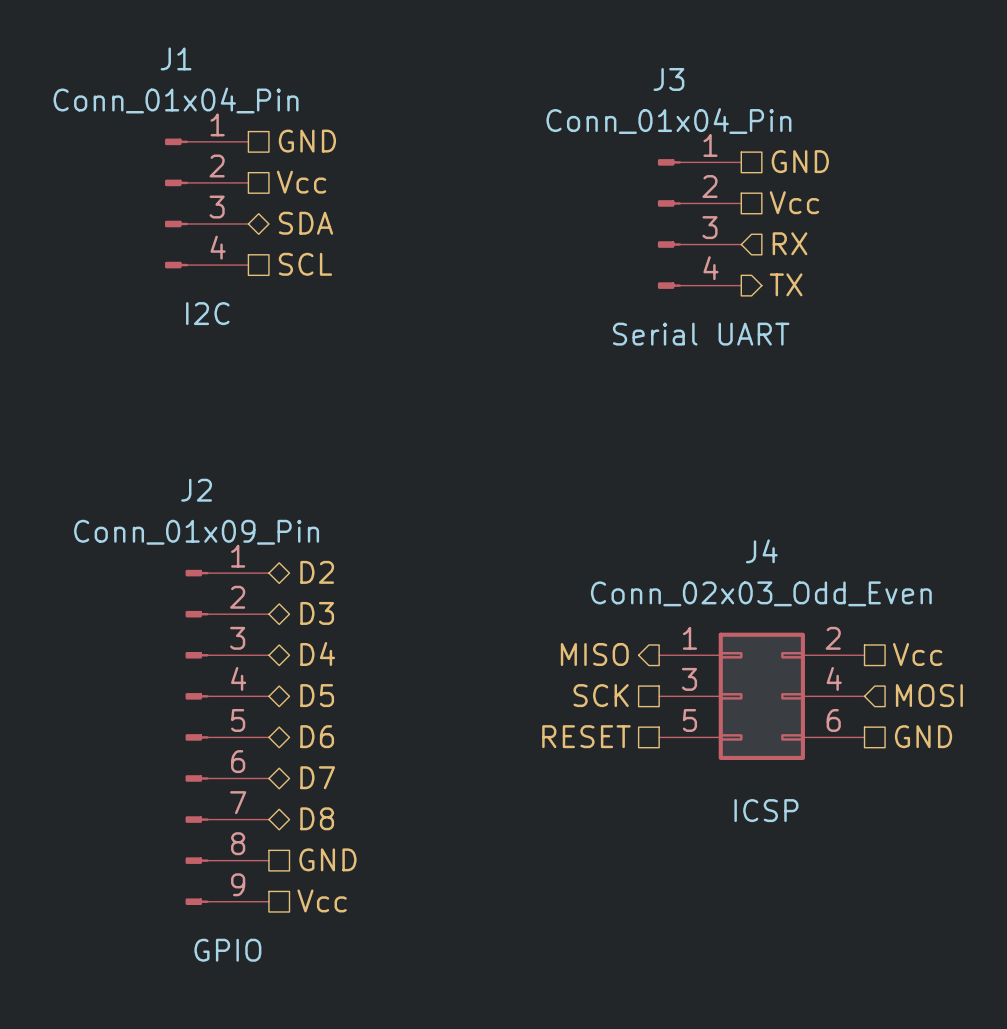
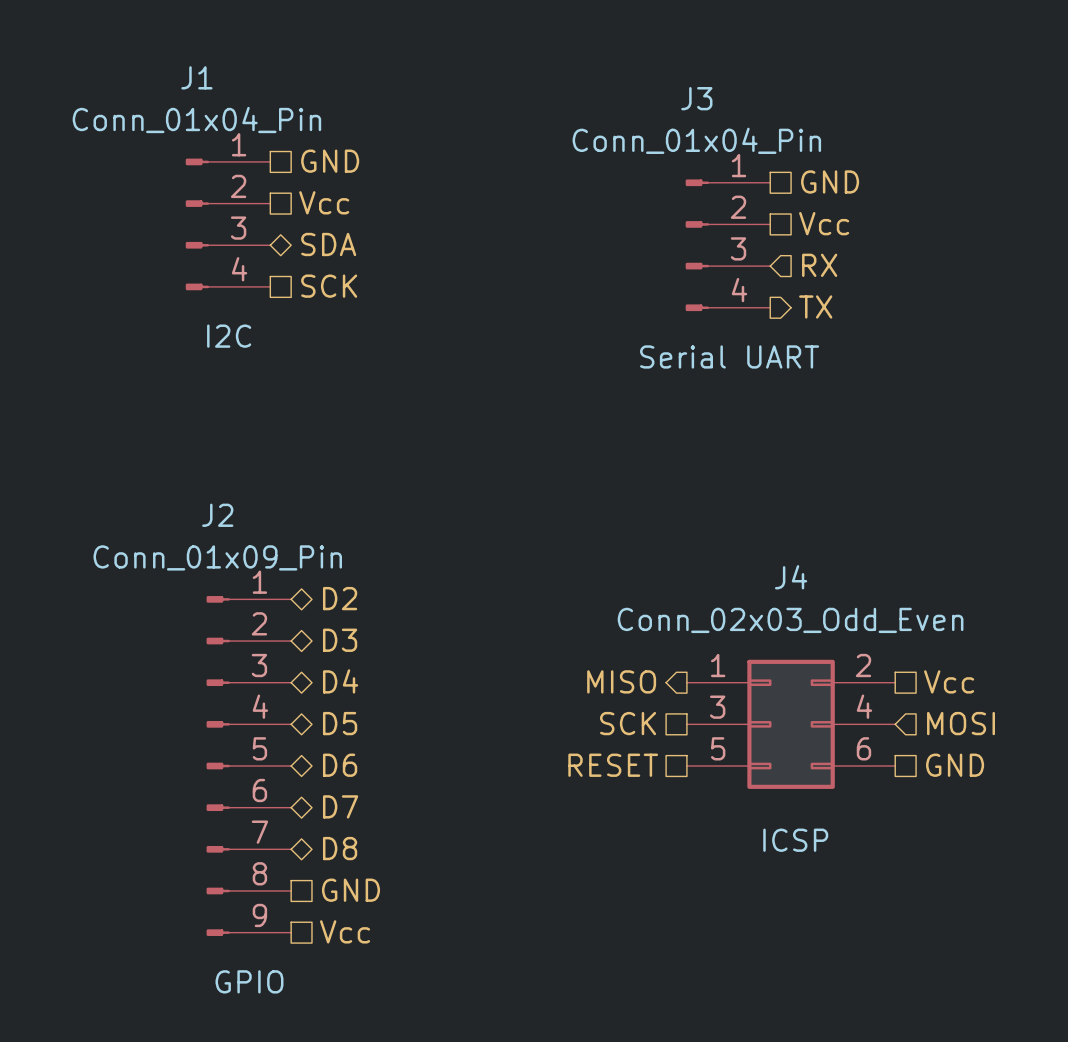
hierarchical label: SCL (305, 264) -> SCK (329, 286)

